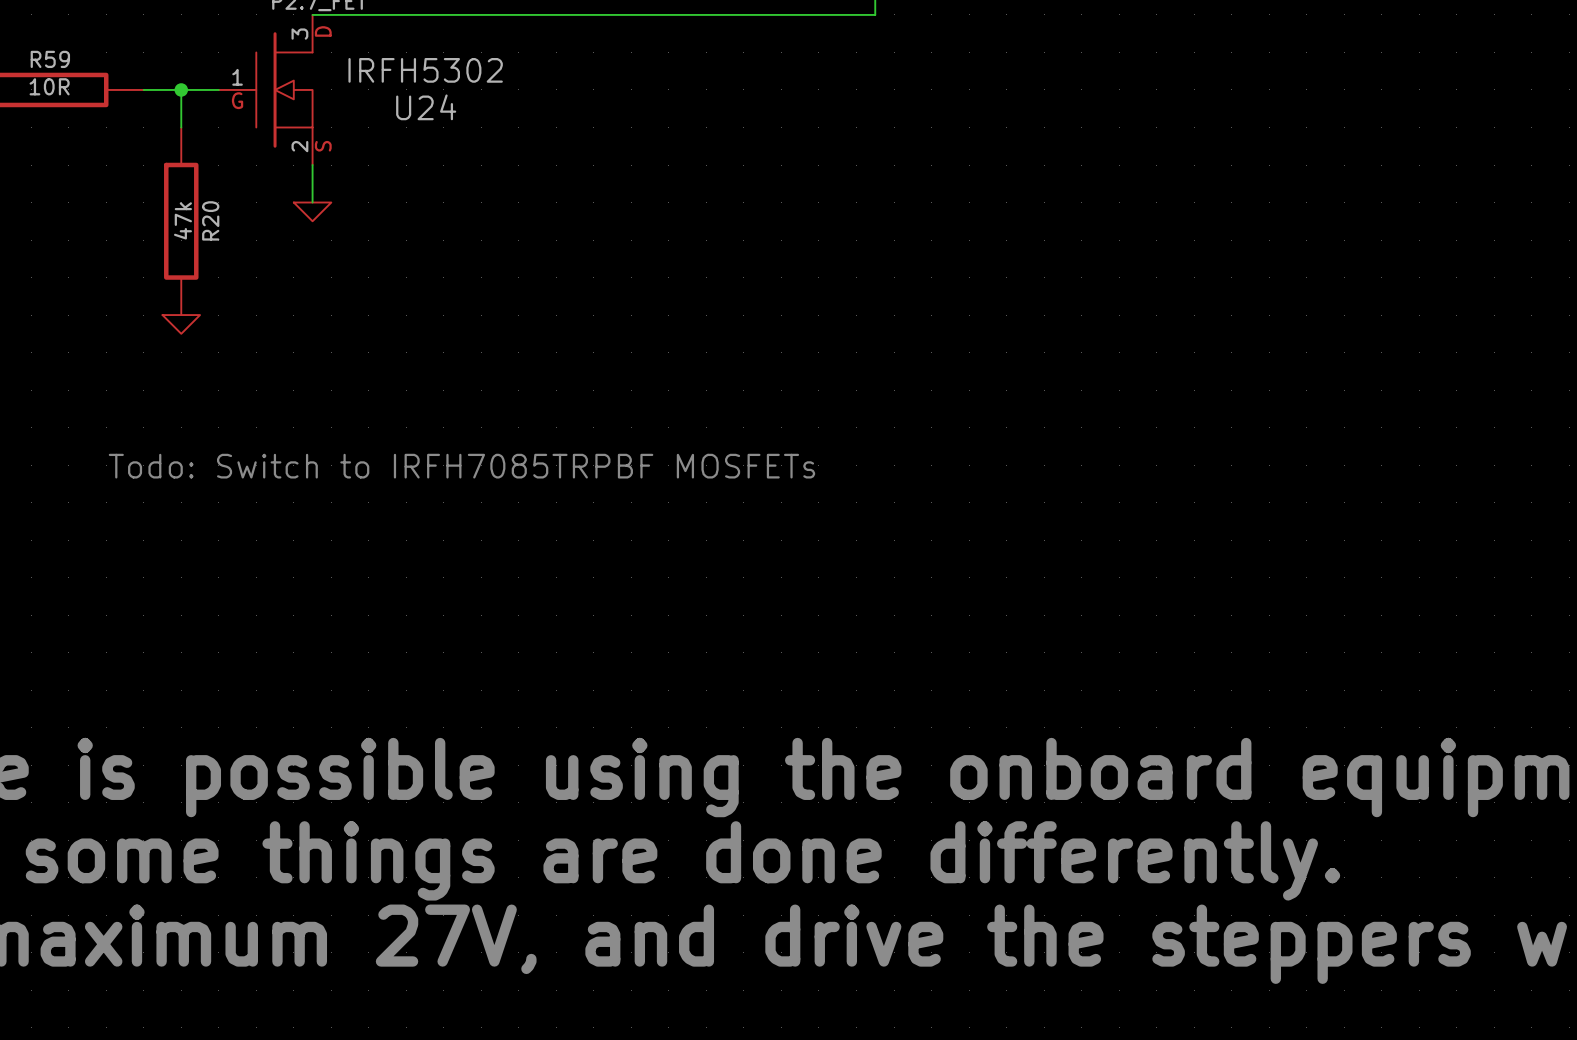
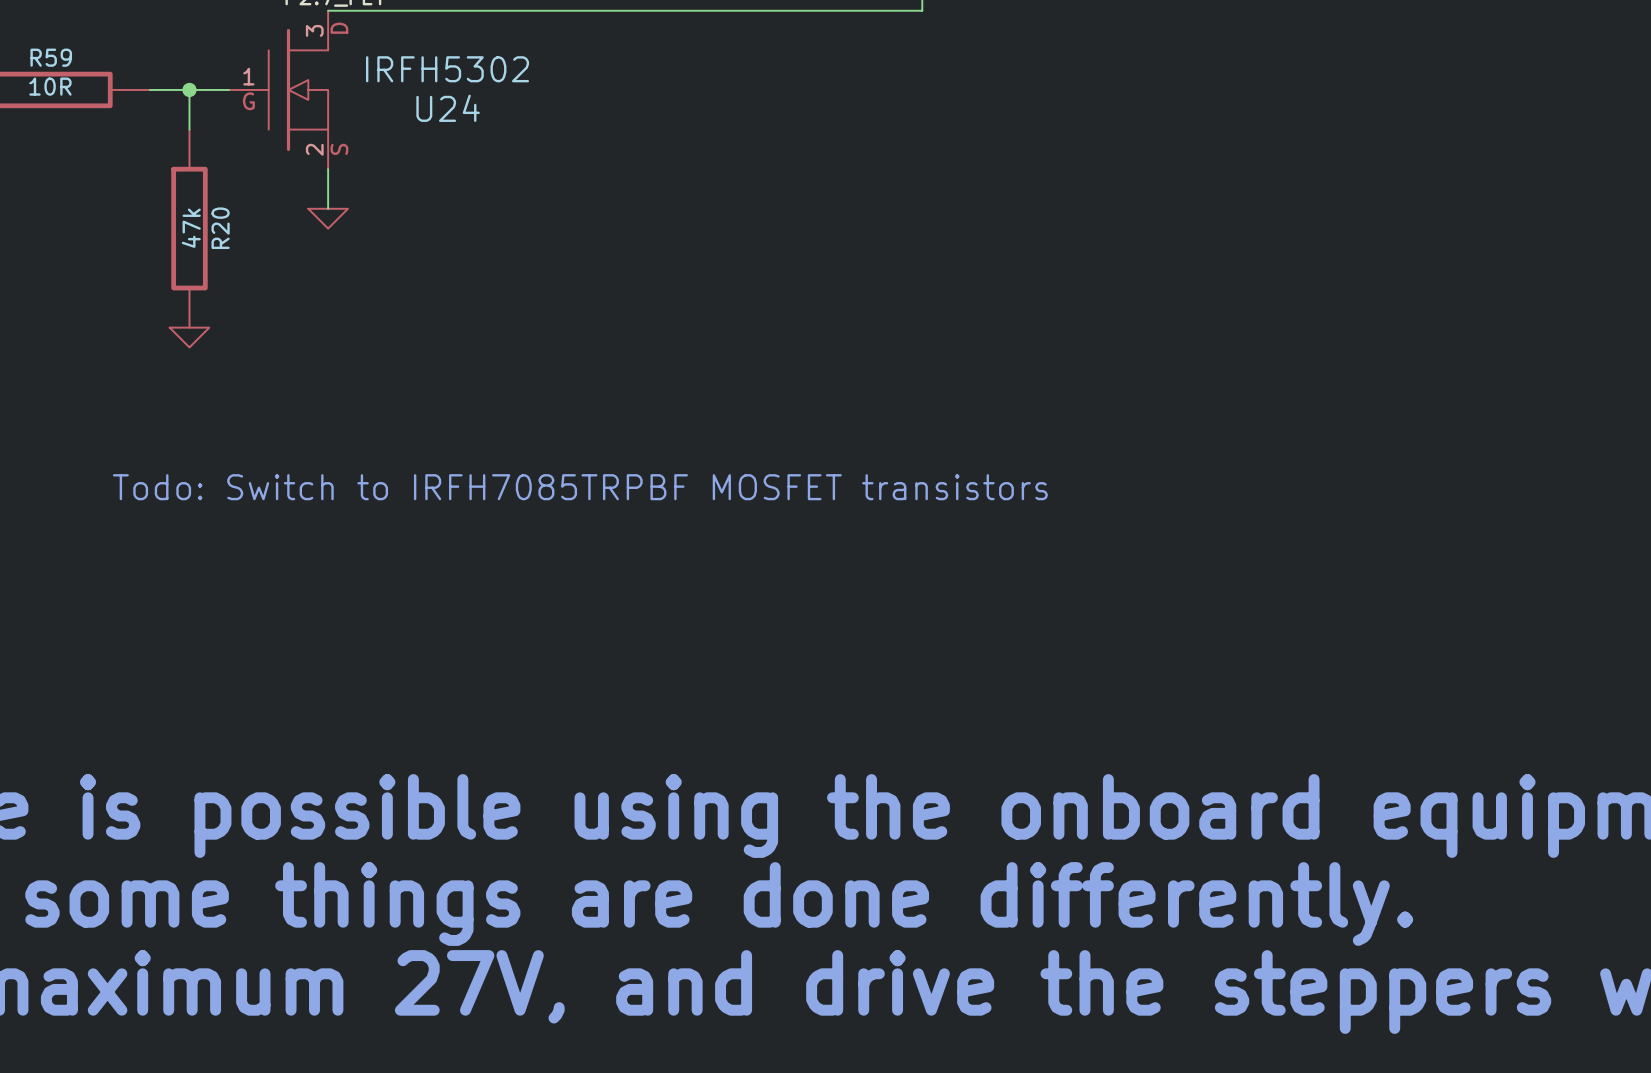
text: Todo: Switch to IRFH7085TRPBF MOSFETs (461, 466) -> Todo: Switch to IRFH7085TRPBF MOSFET transistors (580, 487)

